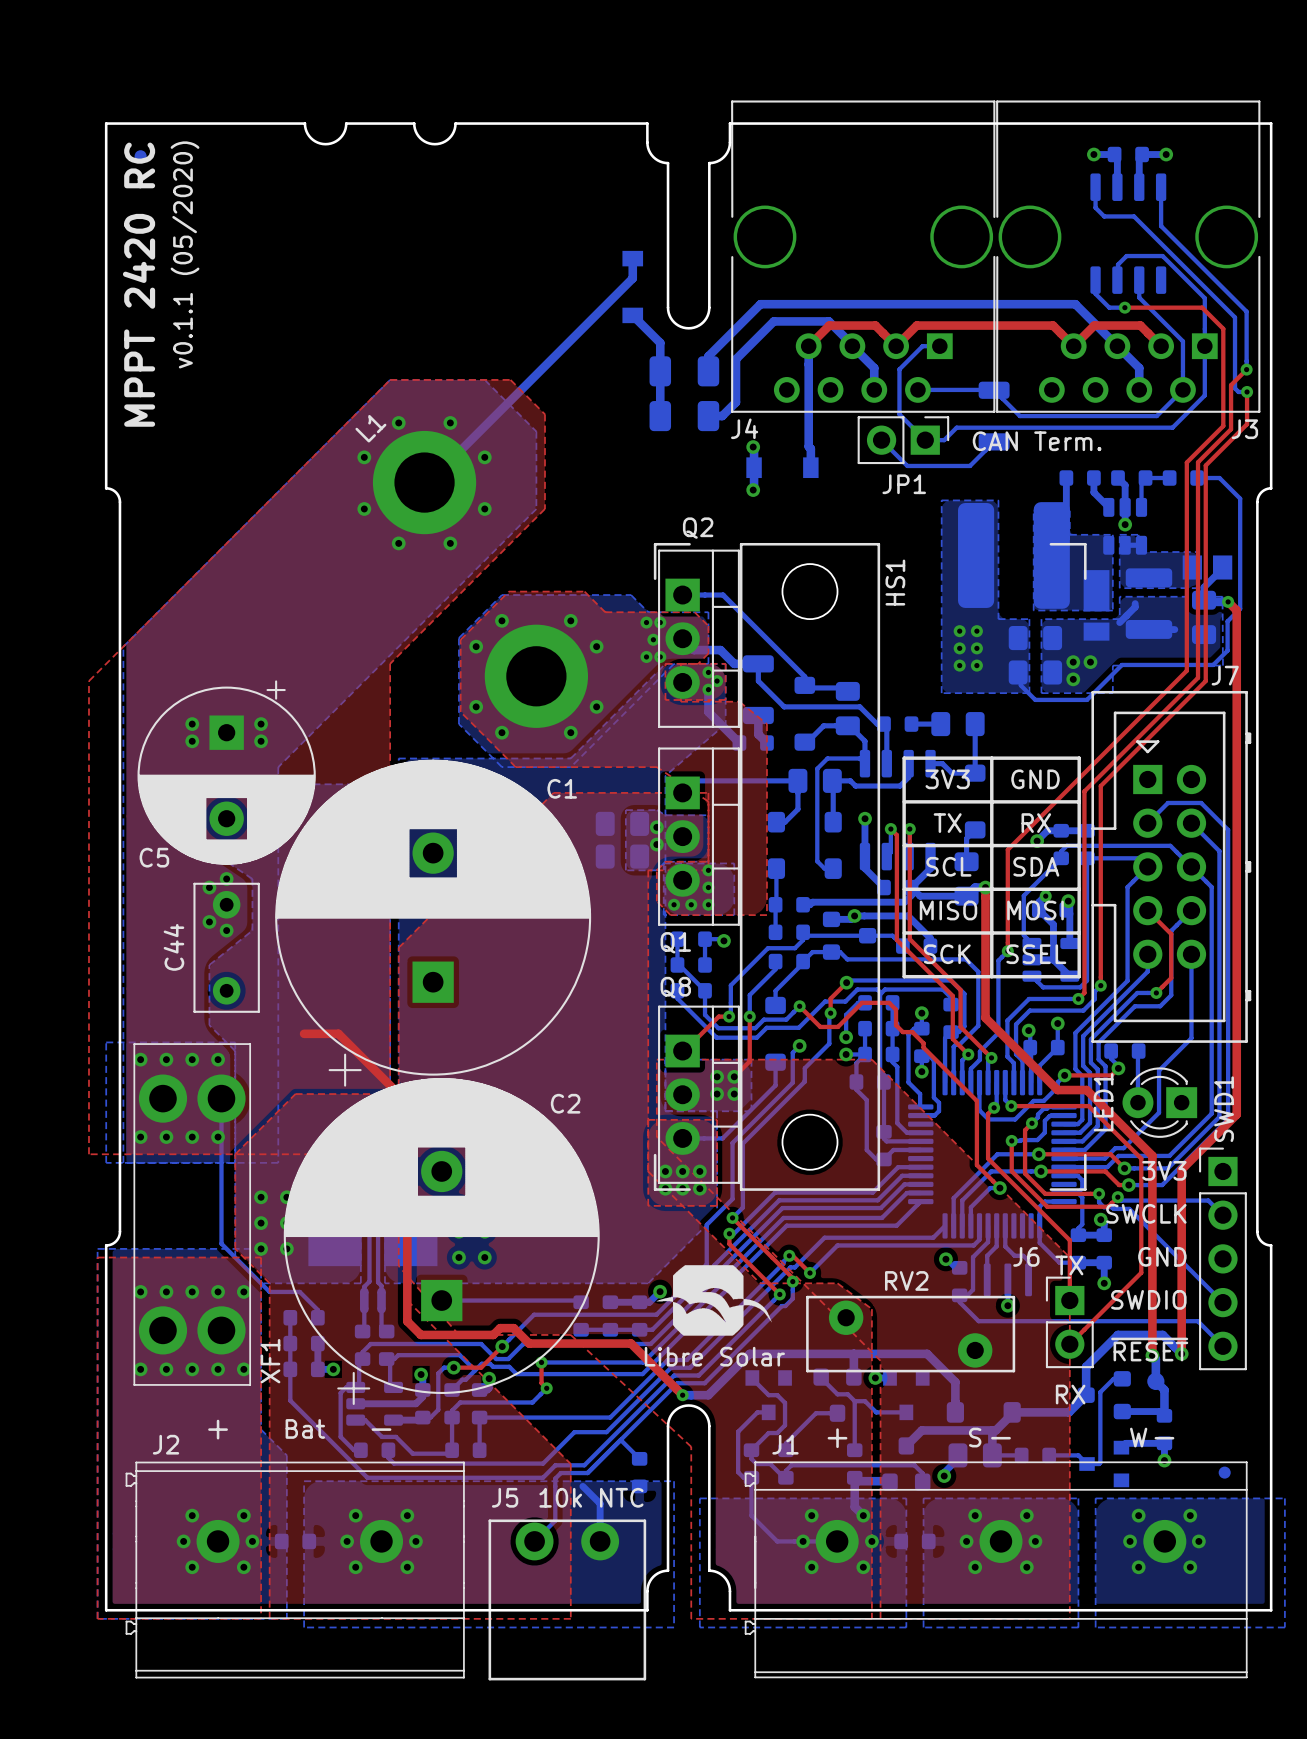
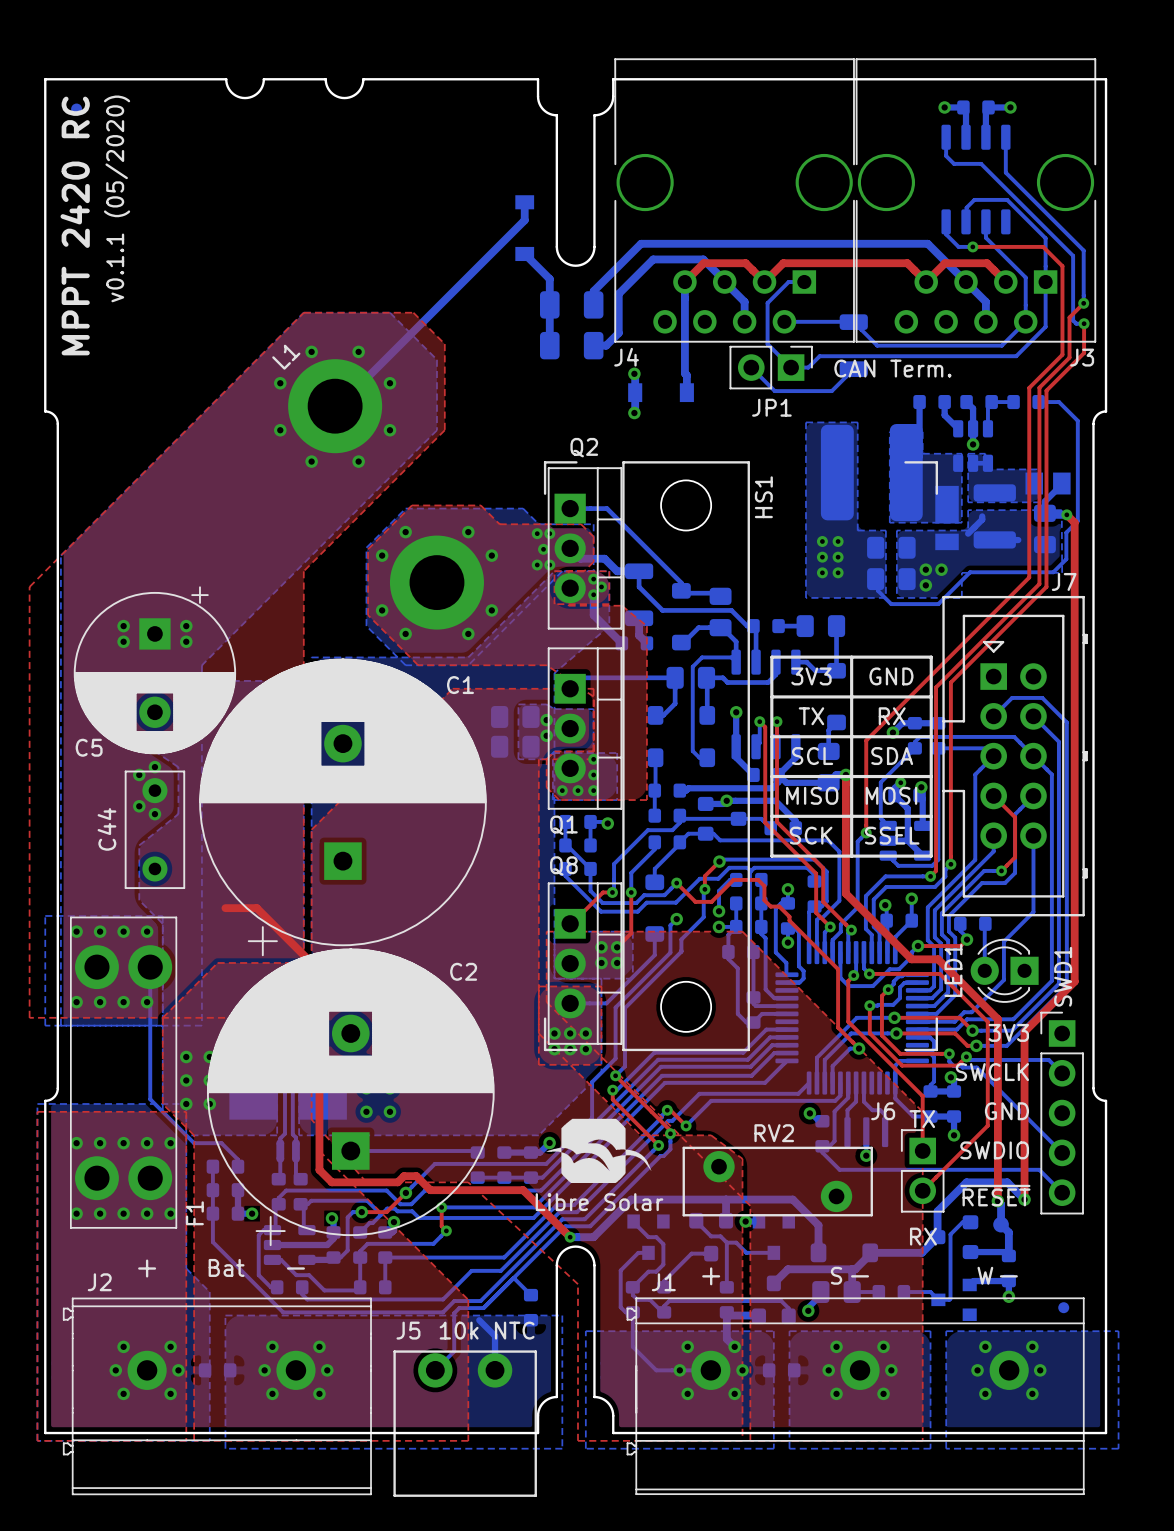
XF1 name: XF1 (270, 1361) -> F1 (194, 1213)

